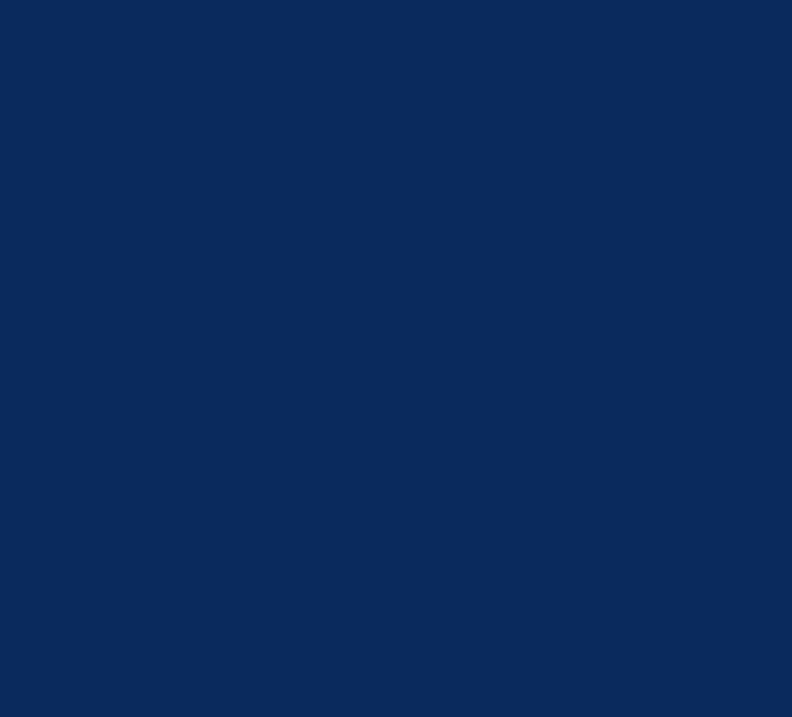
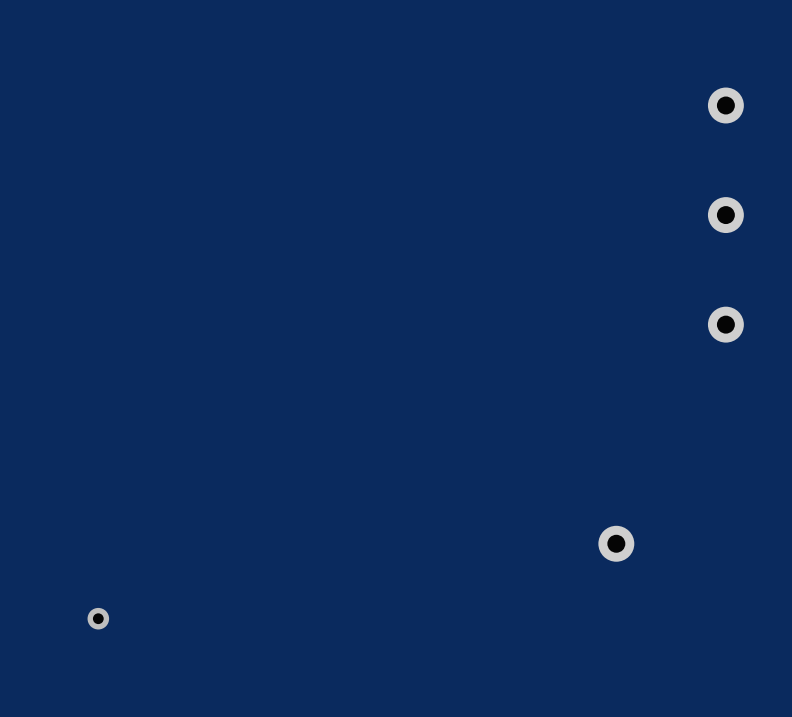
part: none -> (725, 105)
part: none -> (725, 215)
part: none -> (725, 324)
part: none -> (616, 543)
via: none -> (98, 618)

